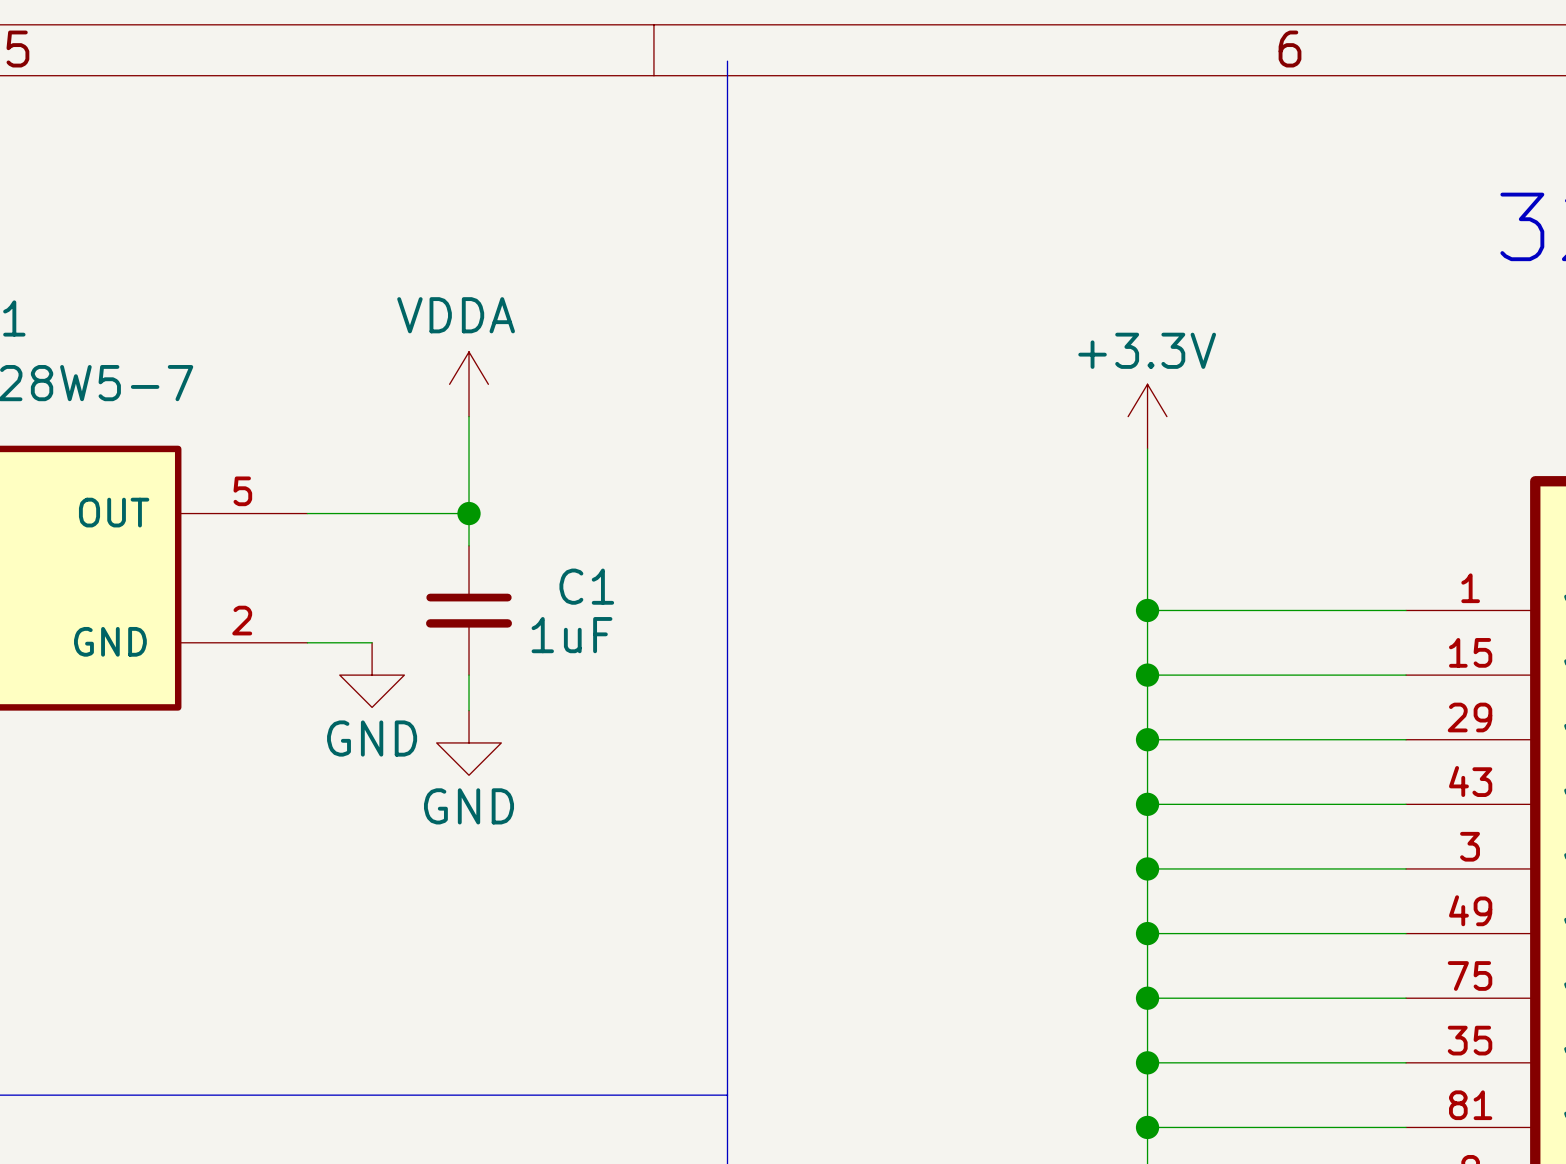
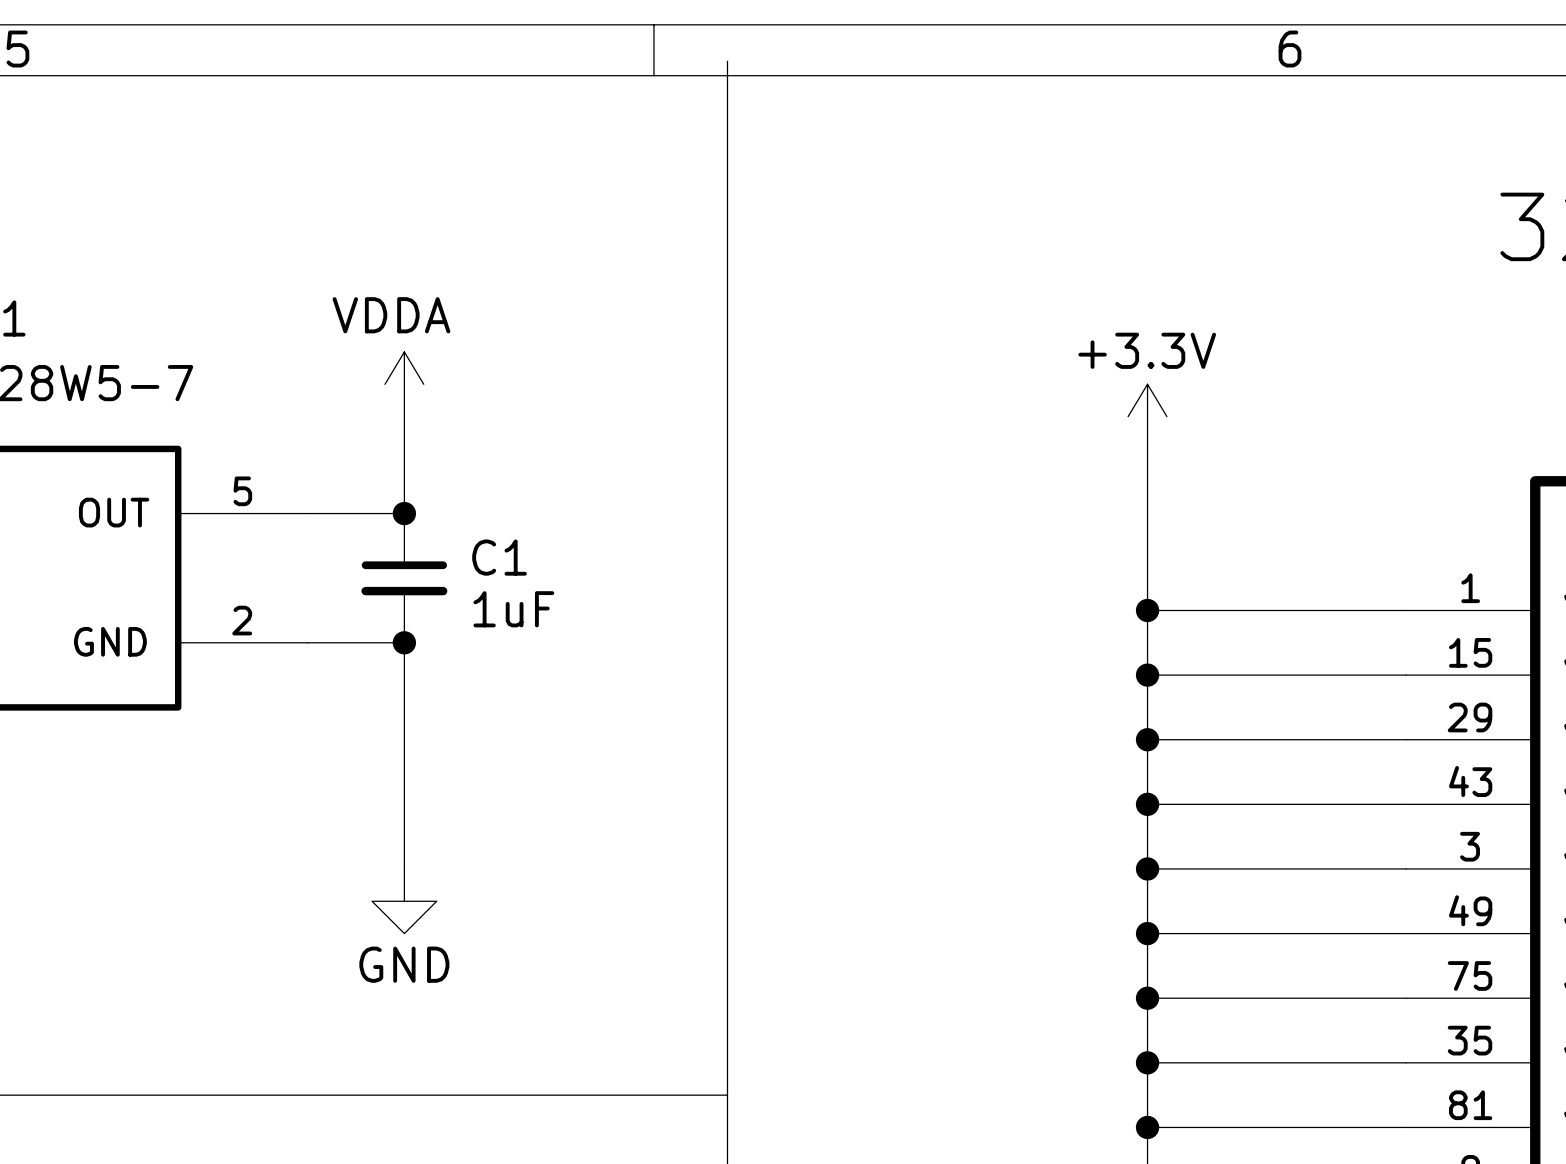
power symbol position: VDDA (469, 384) -> VDDA (404, 384)
wire: (469, 416) (469, 545) -> none
wire: (404, 513) (469, 513) -> (404, 513) (404, 416)
junction position: (469, 513) -> (404, 513)
C1 name position: C1 (586, 586) -> C1 (499, 557)
C1 position: (469, 610) -> (404, 578)
C1 value position: 1uF (572, 635) -> 1uF (513, 609)
wire: none -> (372, 642) (404, 642) (404, 868)
junction: none -> (404, 642)
power symbol: GND (372, 675) -> none
wire: (469, 675) (469, 710) -> none
power symbol: GND (469, 742) -> none
power symbol: none -> GND (404, 901)

